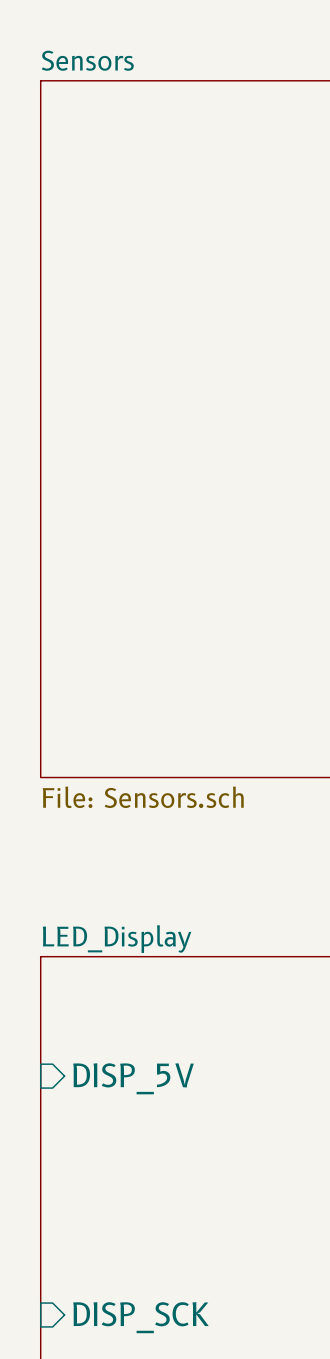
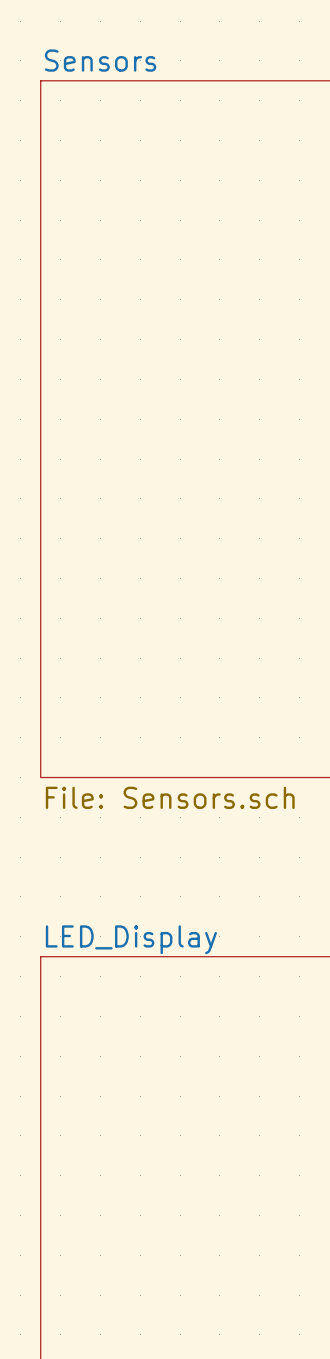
sheet pin: DISP_5V (133, 1078) -> none
sheet pin: DISP_SCK (140, 1317) -> none

